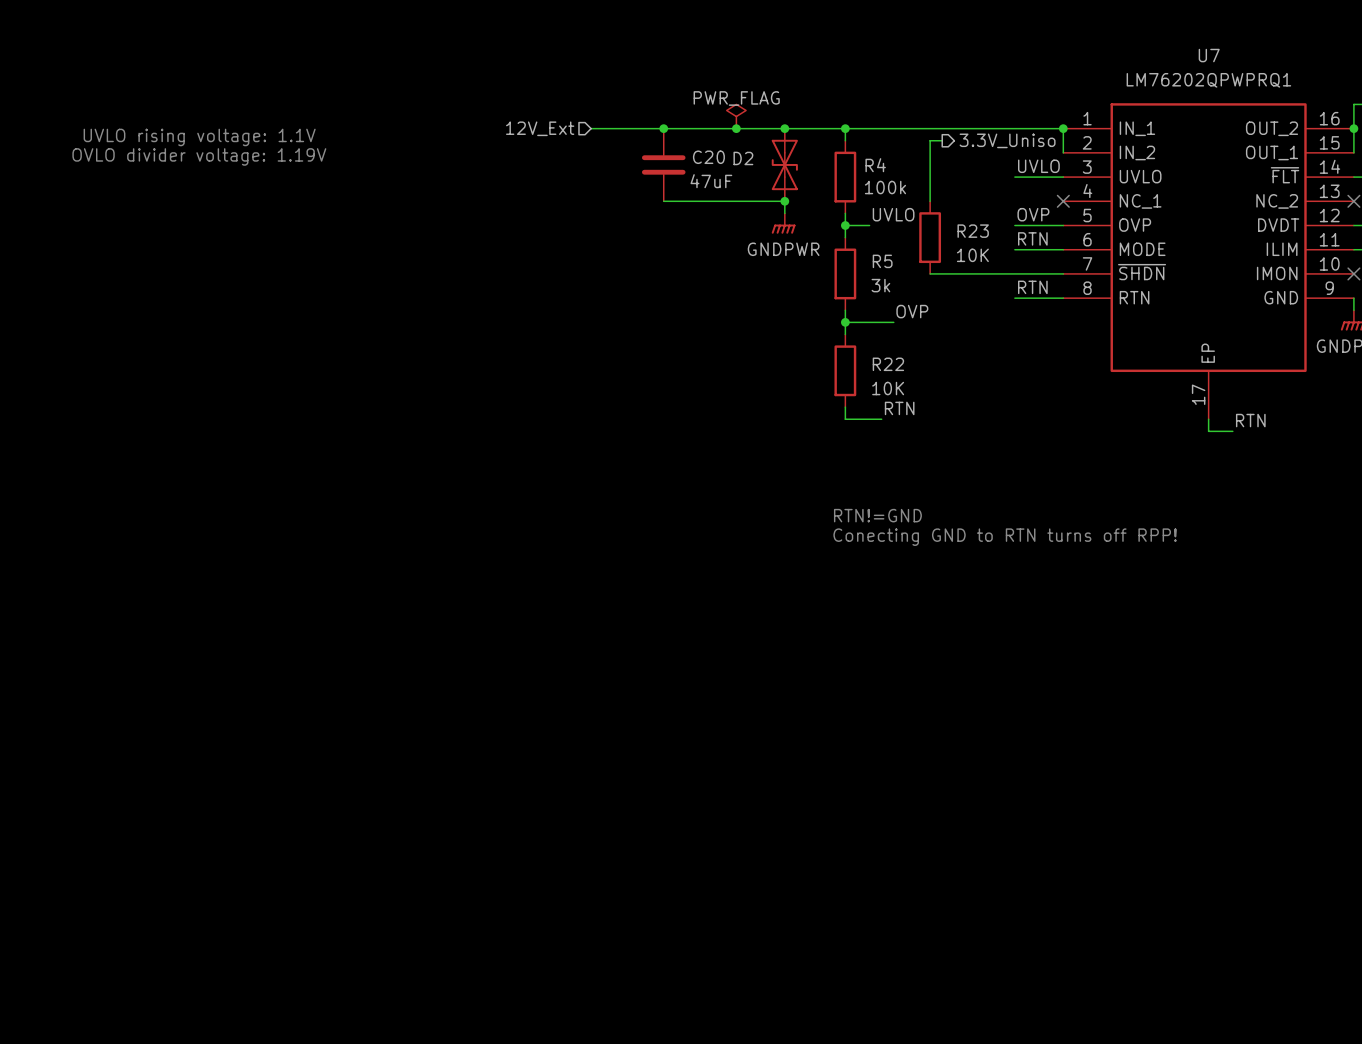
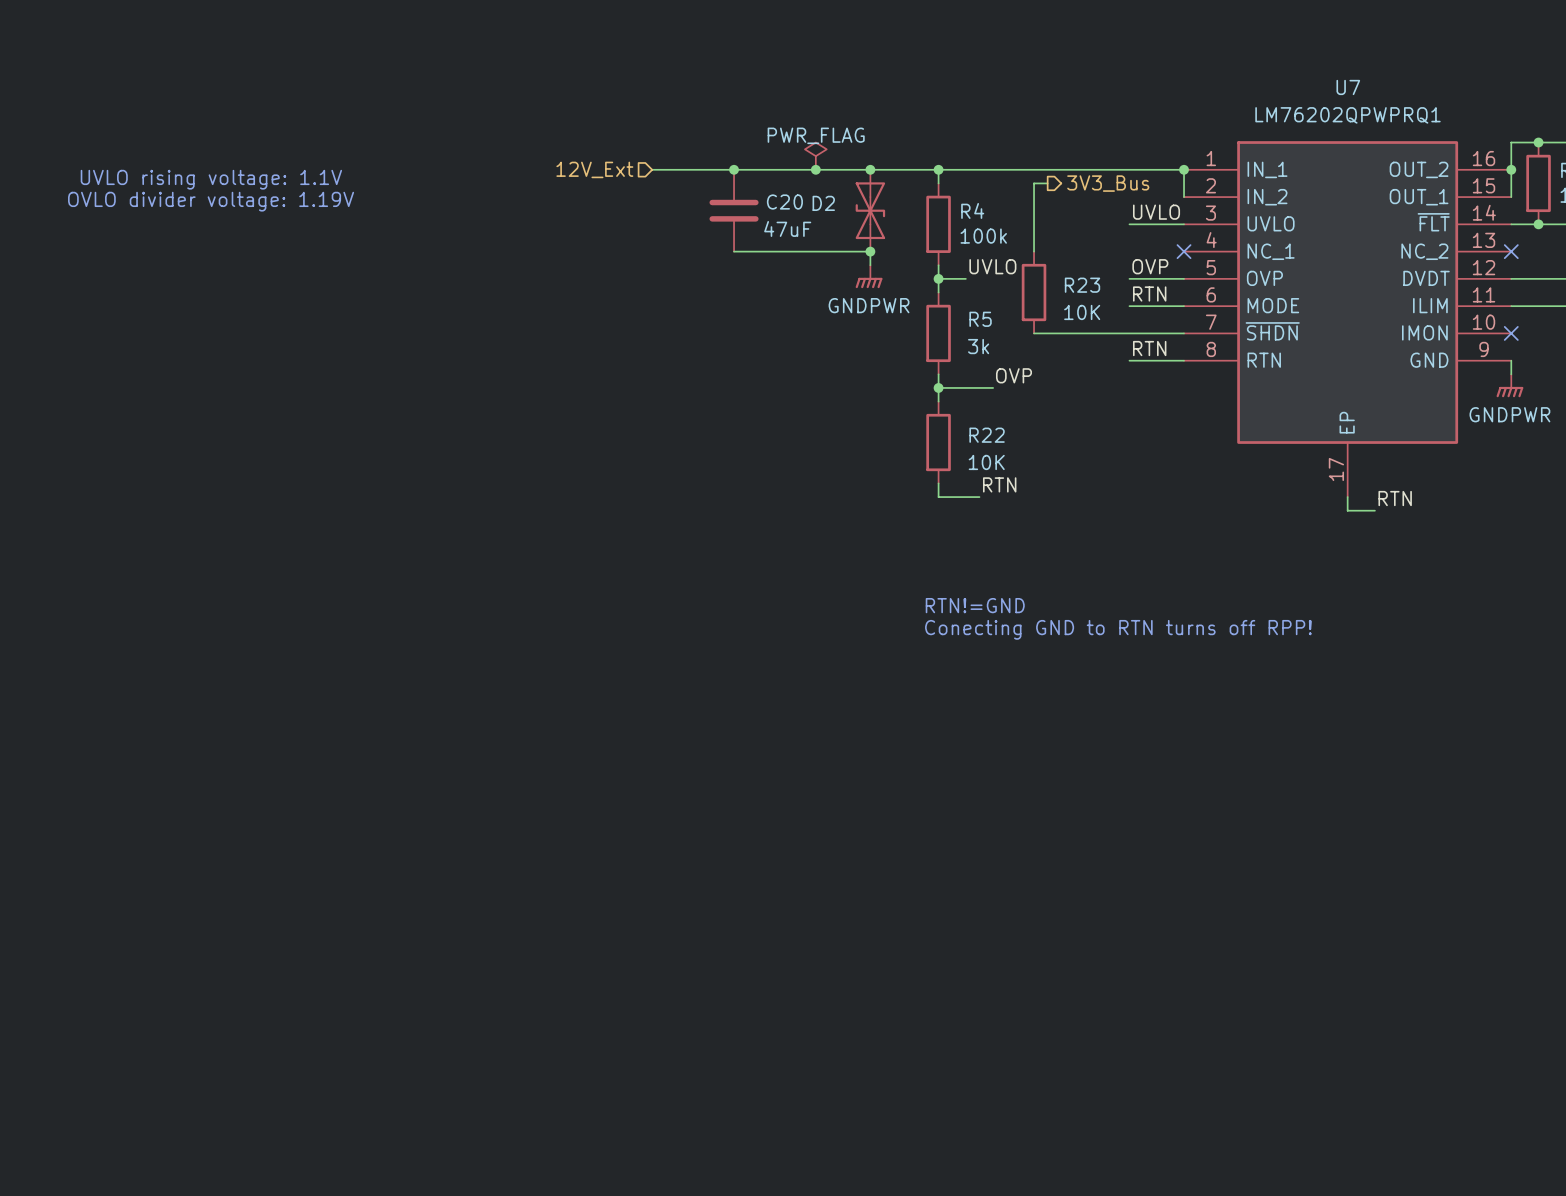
hierarchical label: 3.3V_Uniso (1007, 140) -> 3V3_Bus (1108, 183)

